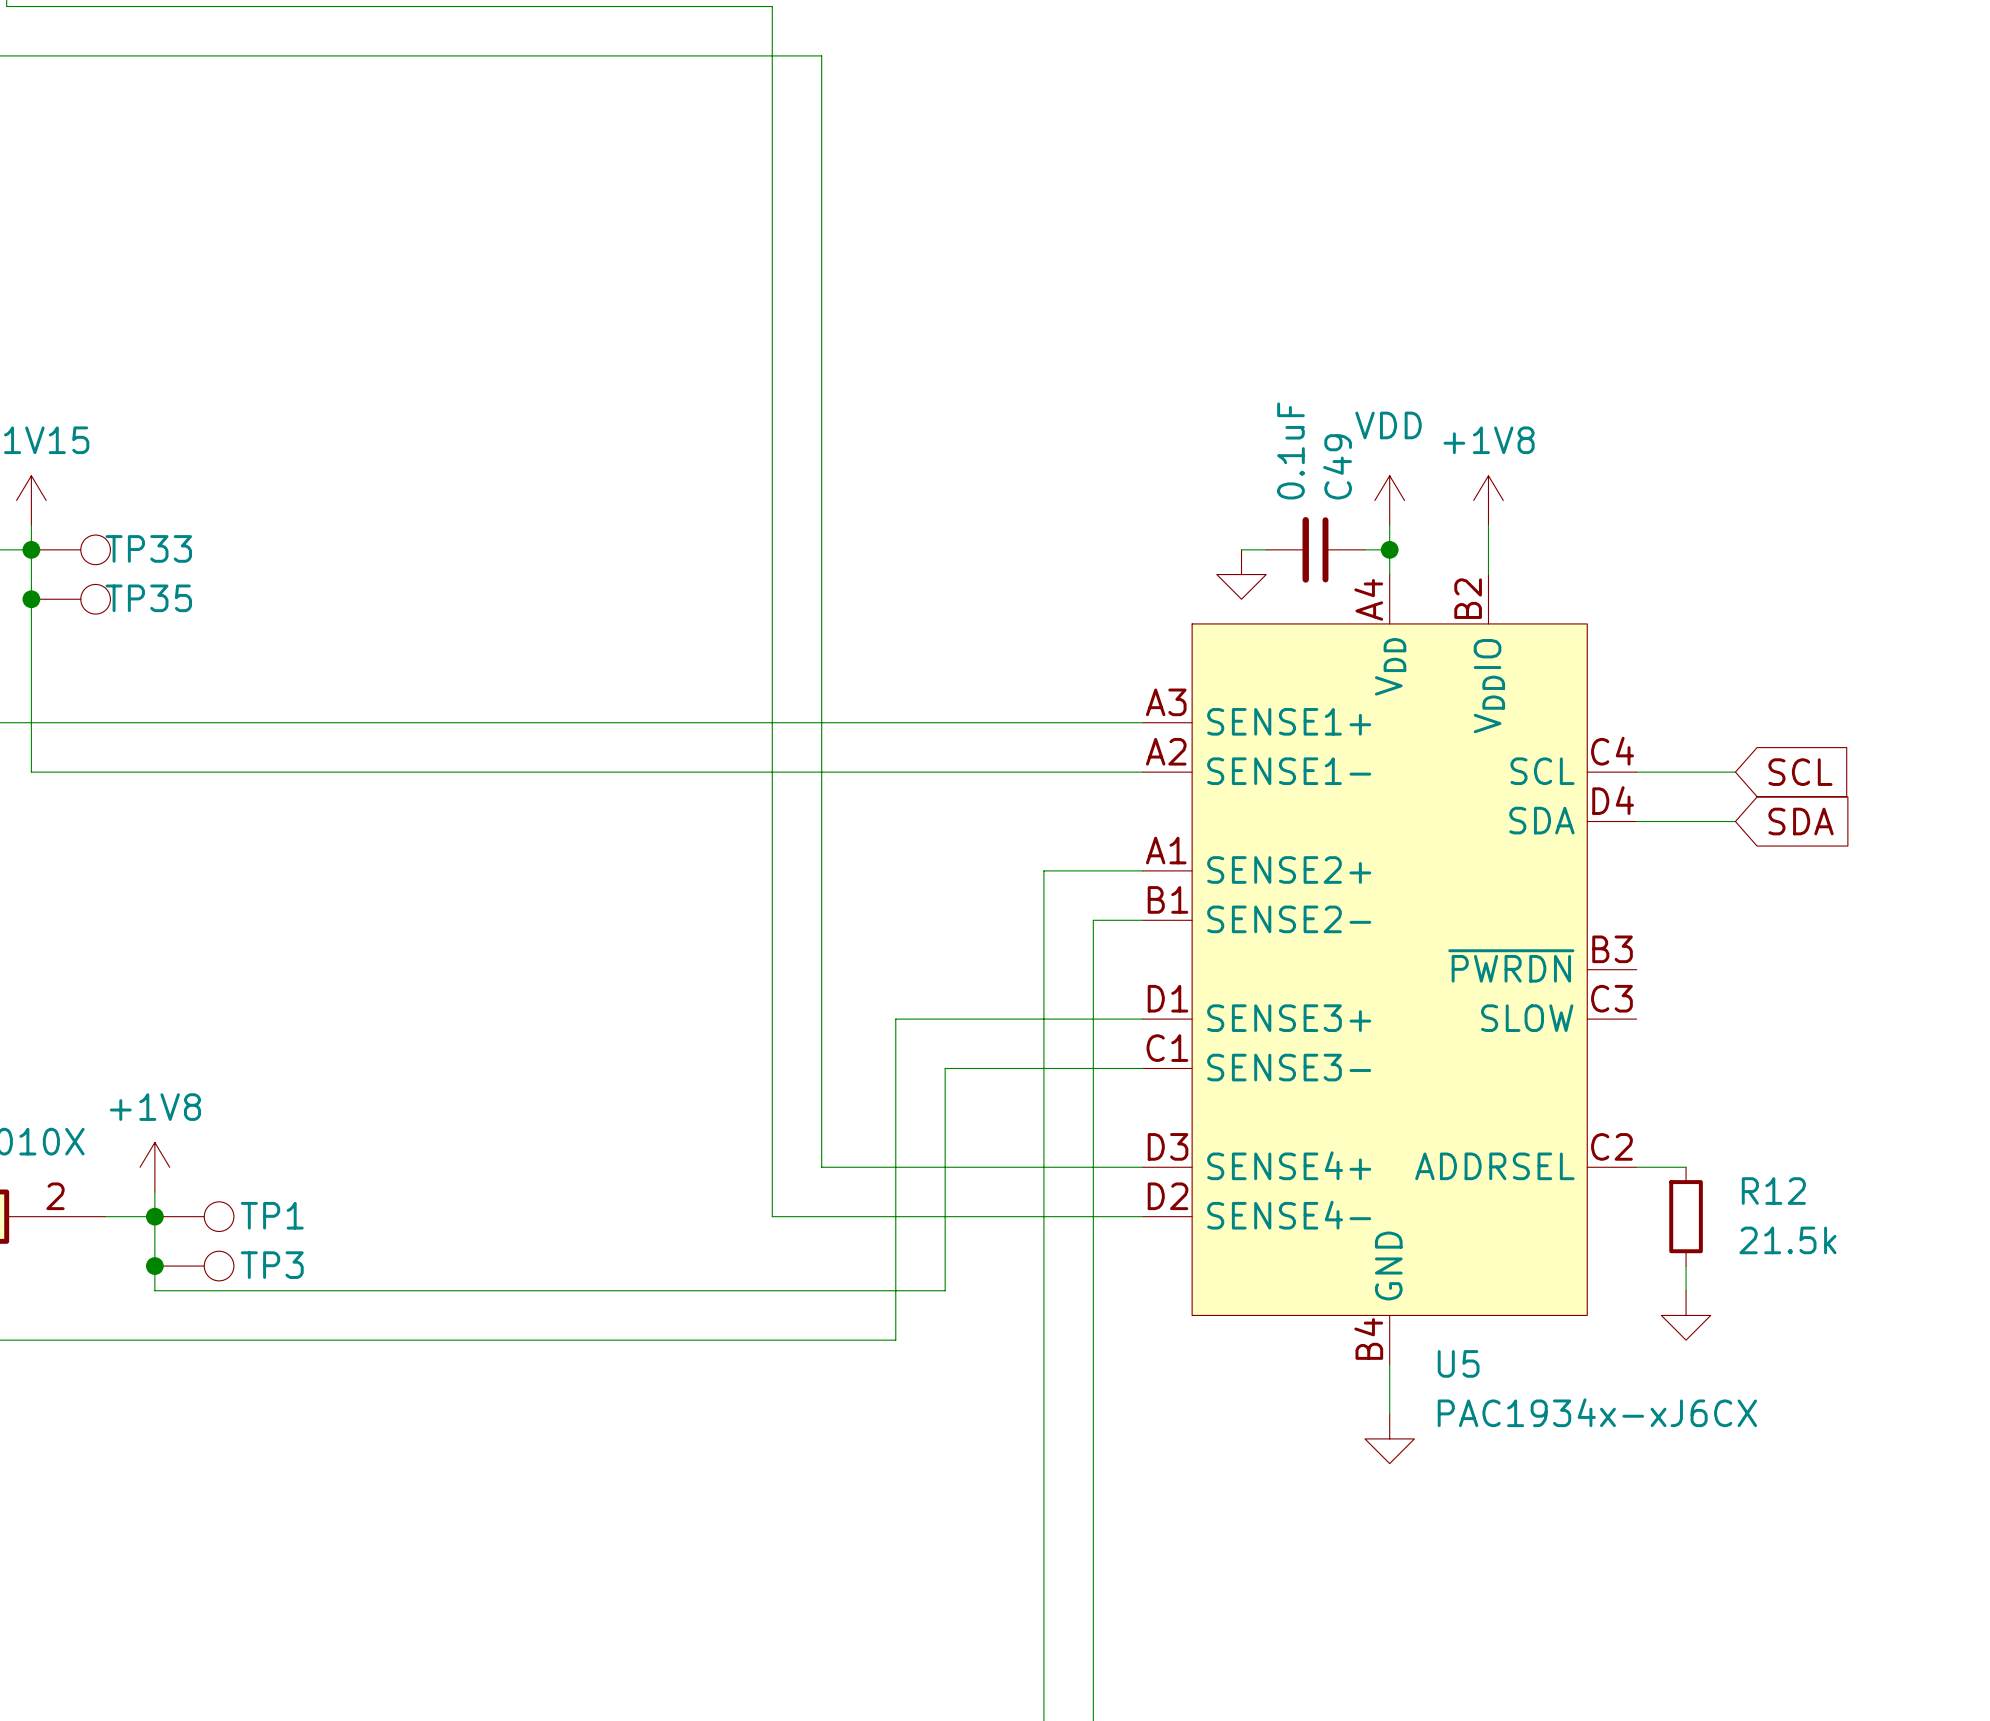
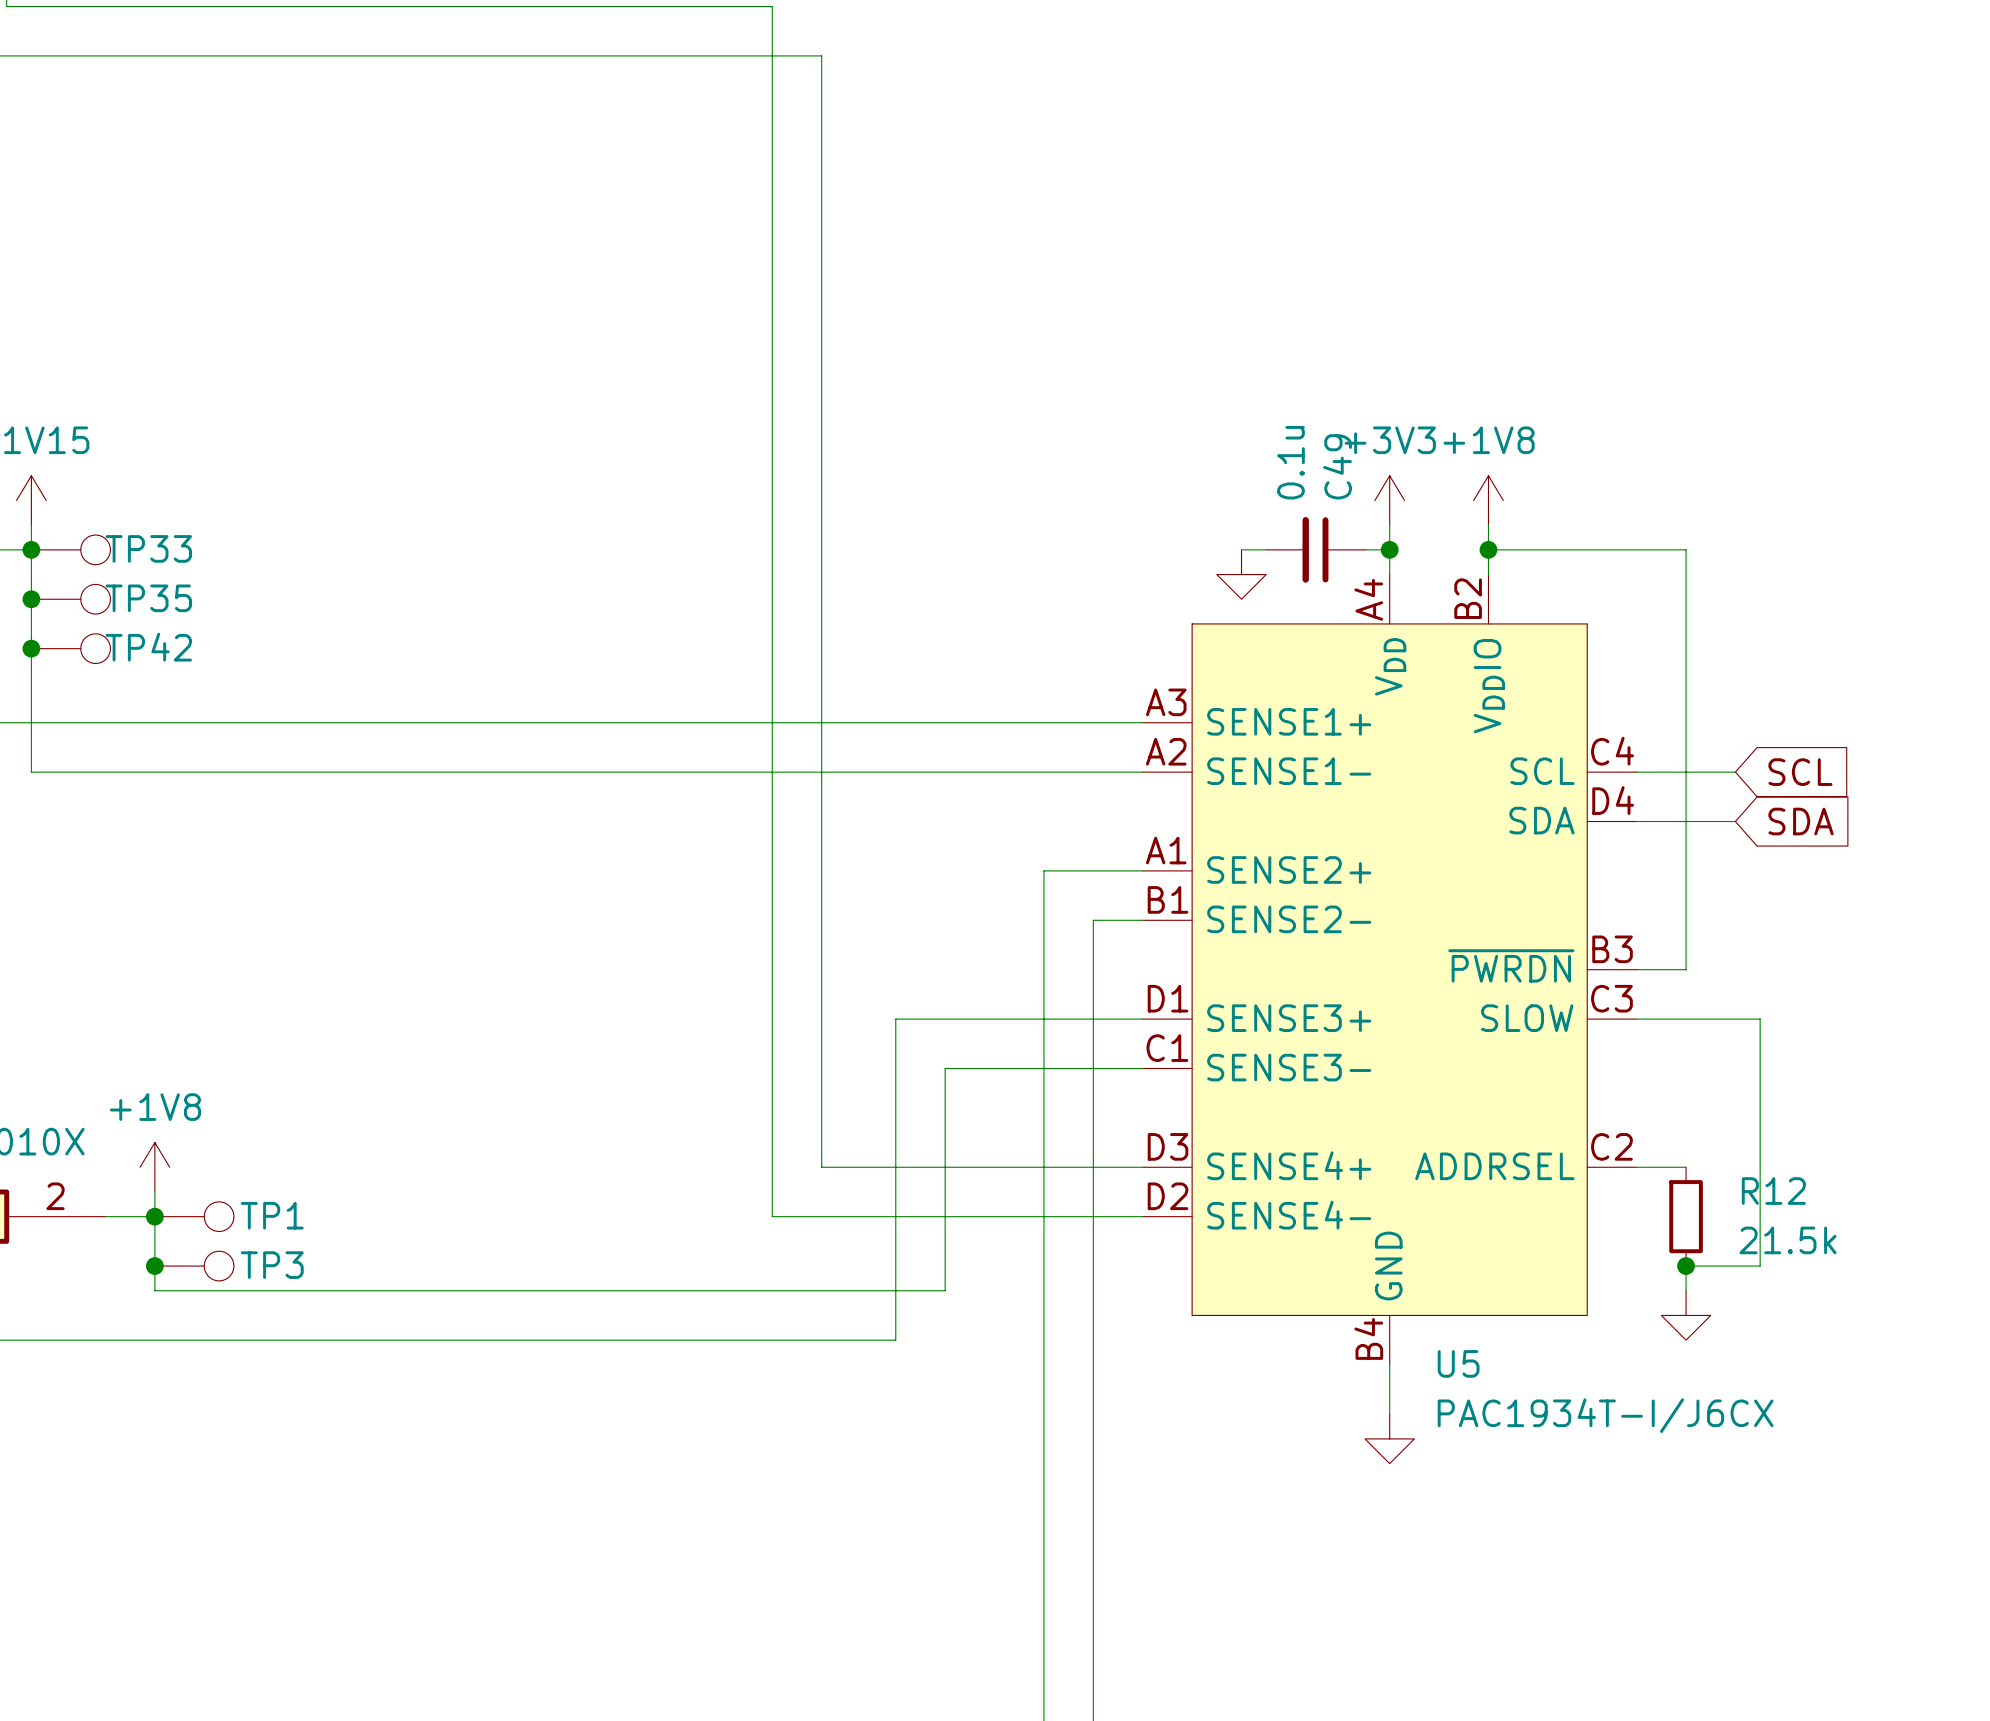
C49 value: 0.1uF (1290, 450) -> 0.1u (1290, 462)
power symbol: VDD (1389, 500) -> +3V3 (1389, 500)
wire: none -> (1488, 549) (1686, 549) (1686, 969) (1636, 969)
junction: none -> (1488, 549)
junction: none -> (31, 648)
TP42: none -> (70, 648)
wire: none -> (1636, 1019) (1760, 1019) (1760, 1266) (1686, 1266)
junction: none -> (1686, 1266)
U5 value: PAC1934x-xJ6CX (1597, 1412) -> PAC1934T-I/J6CX (1605, 1415)

